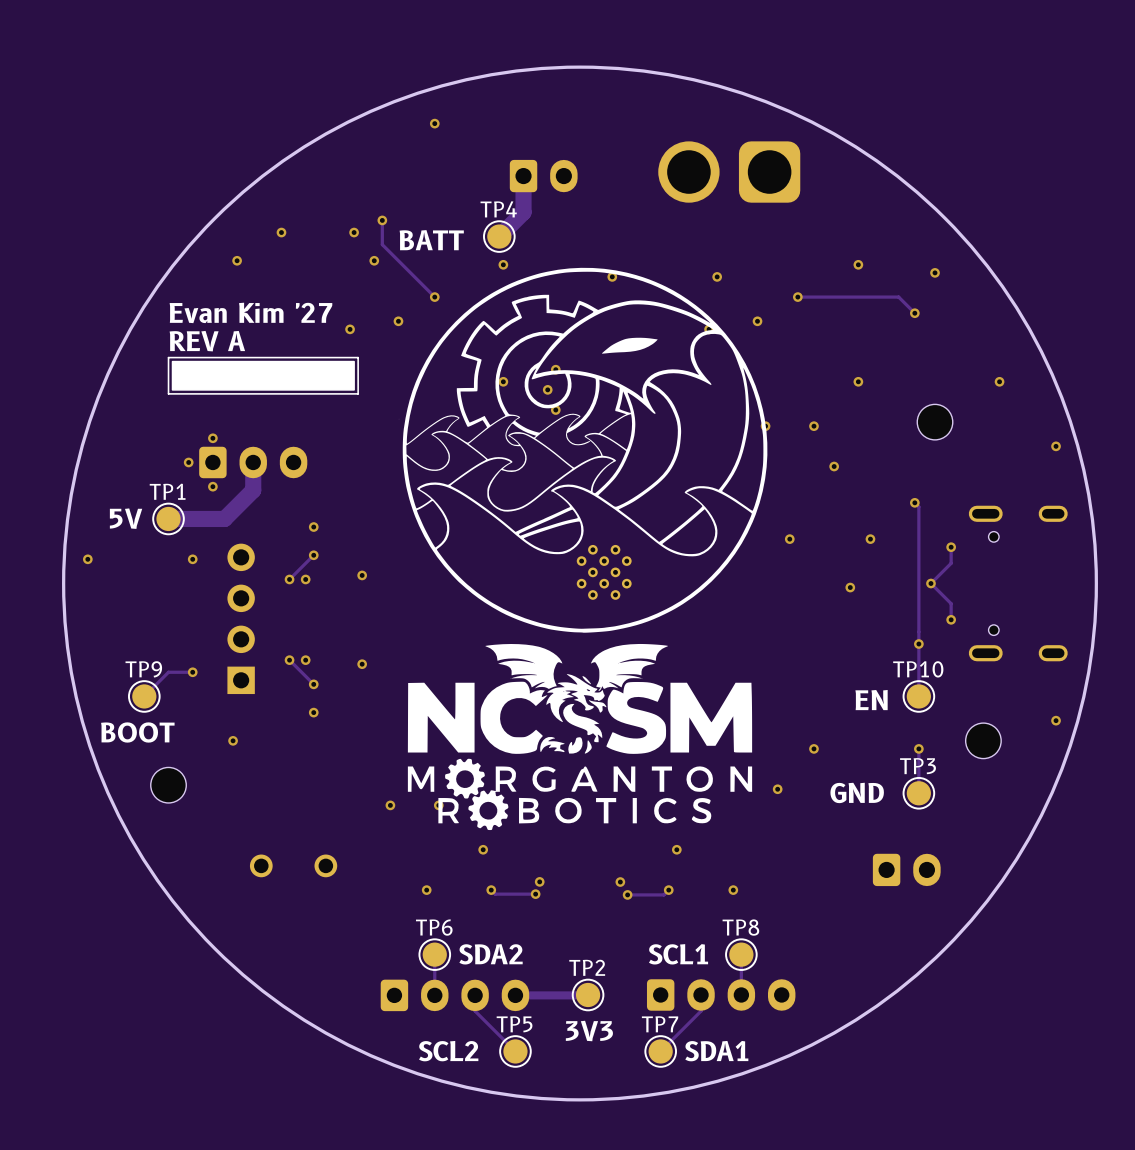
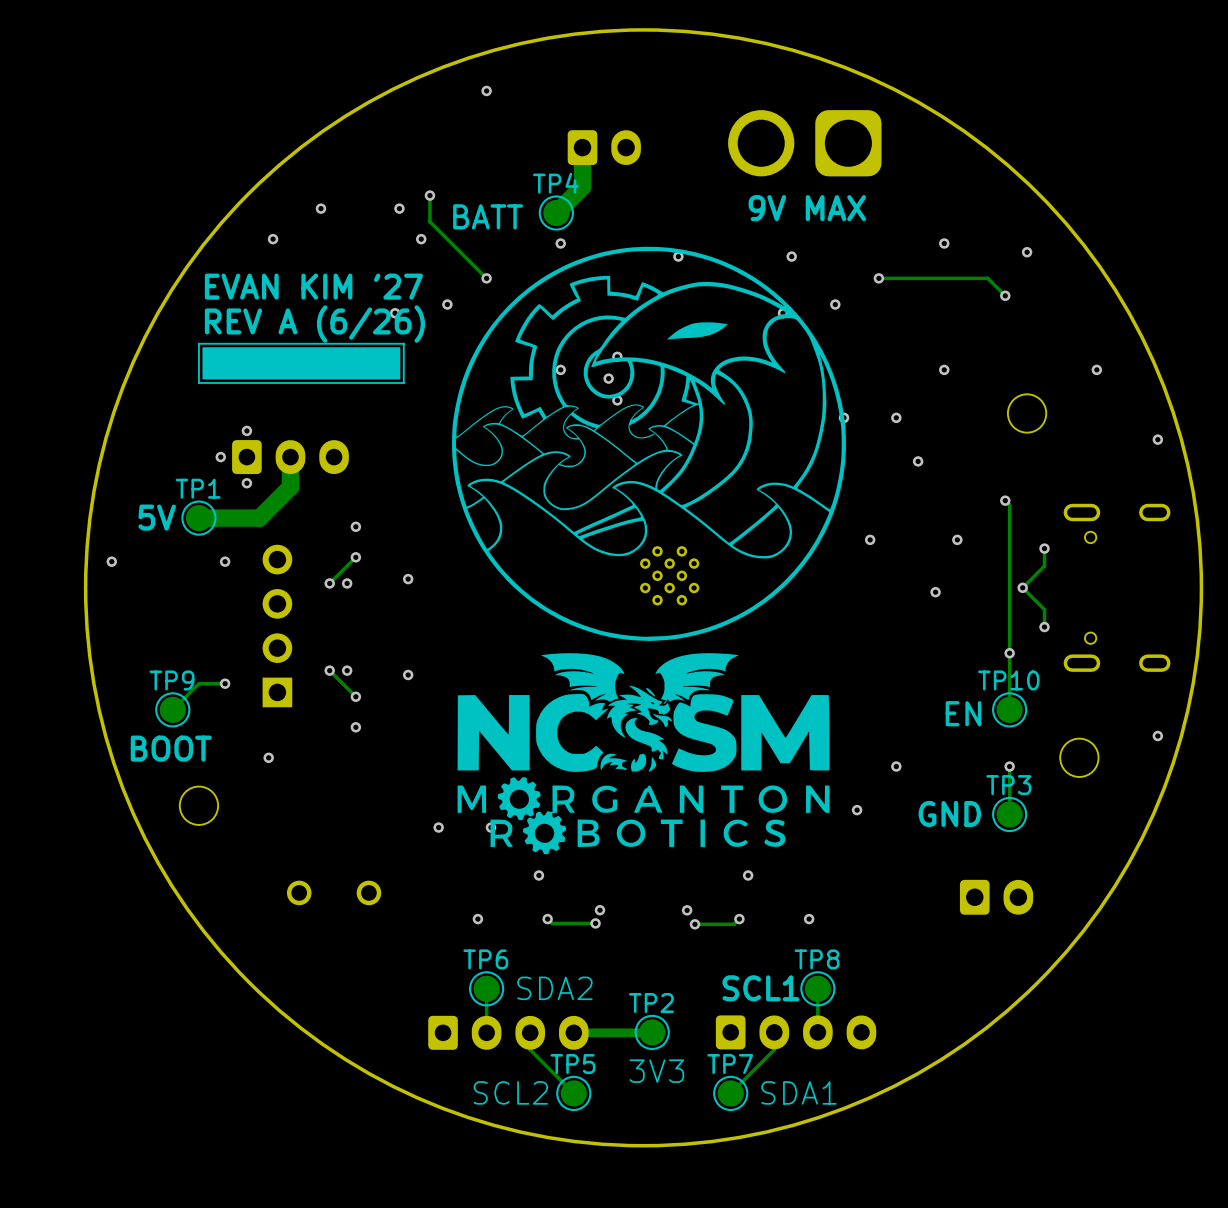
text: none -> 9V MAX (807, 208)
text: Evan Kim '27 (250, 312) -> EVAN KIM '27 (313, 286)
text: REV A (207, 341) -> REV A (6/26) (314, 324)

